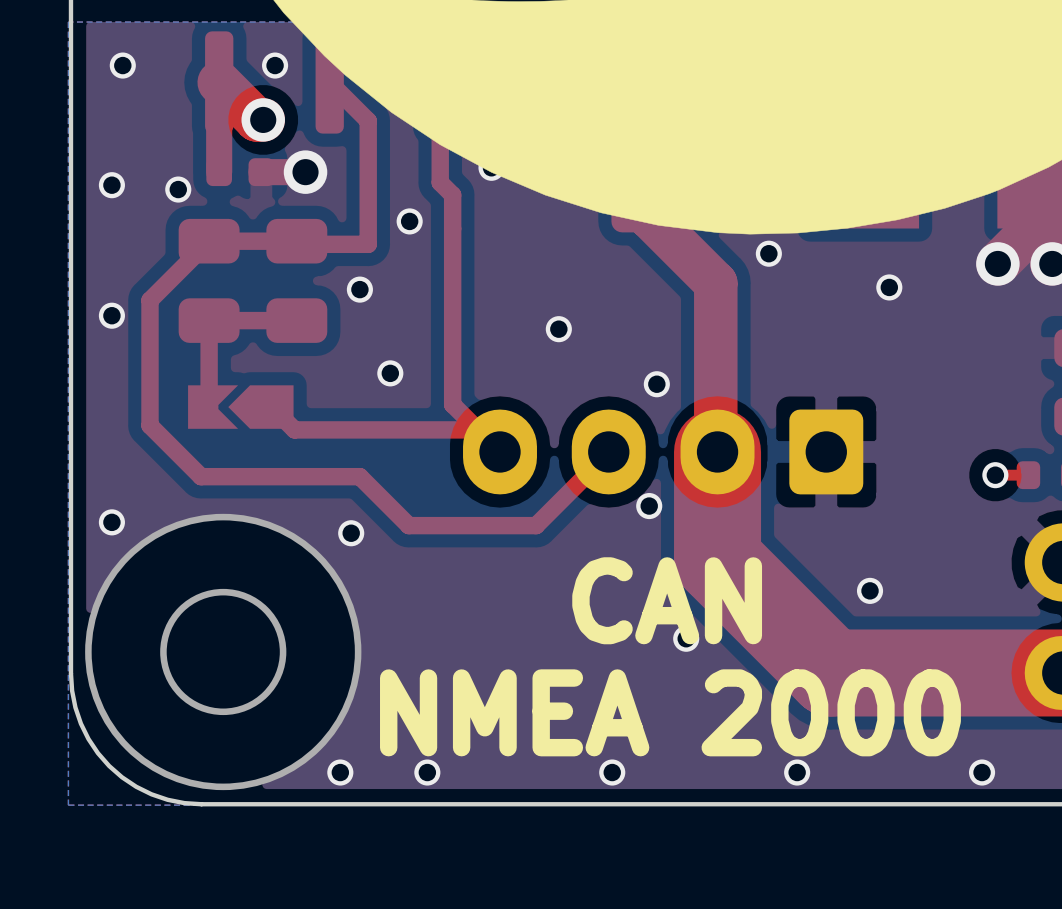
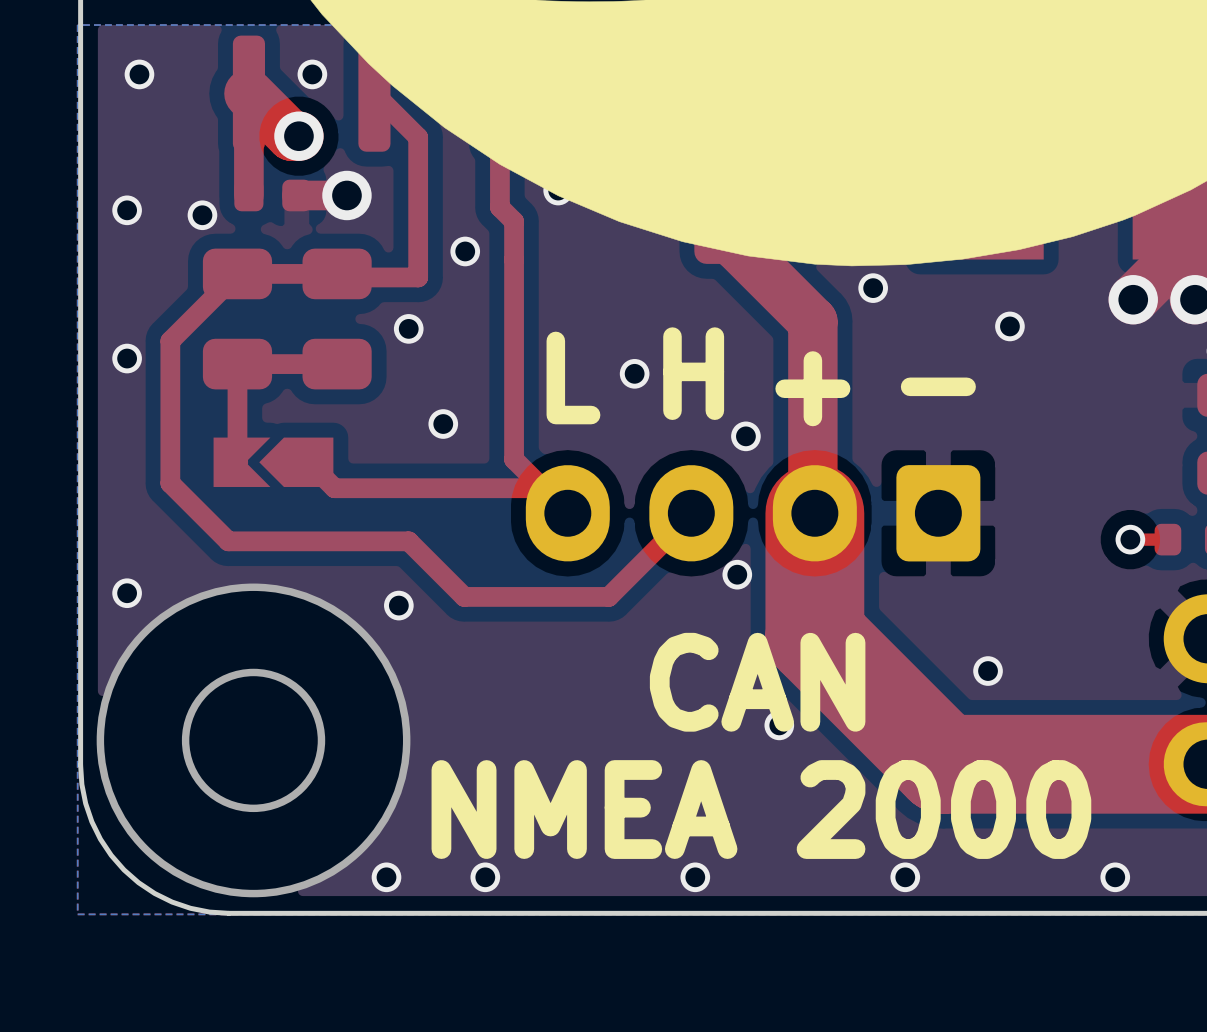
text: none -> H (693, 373)
text: none -> L (573, 377)
text: none -> - (938, 386)
text: none -> + (812, 388)

